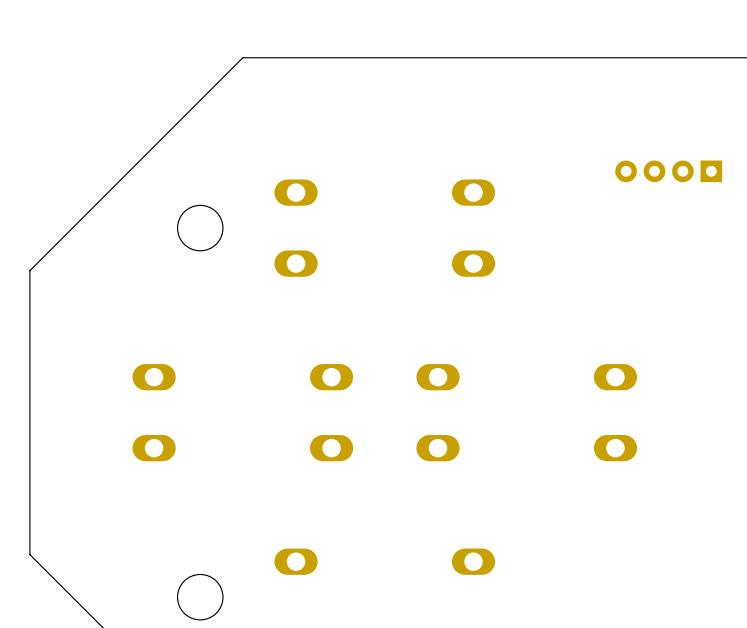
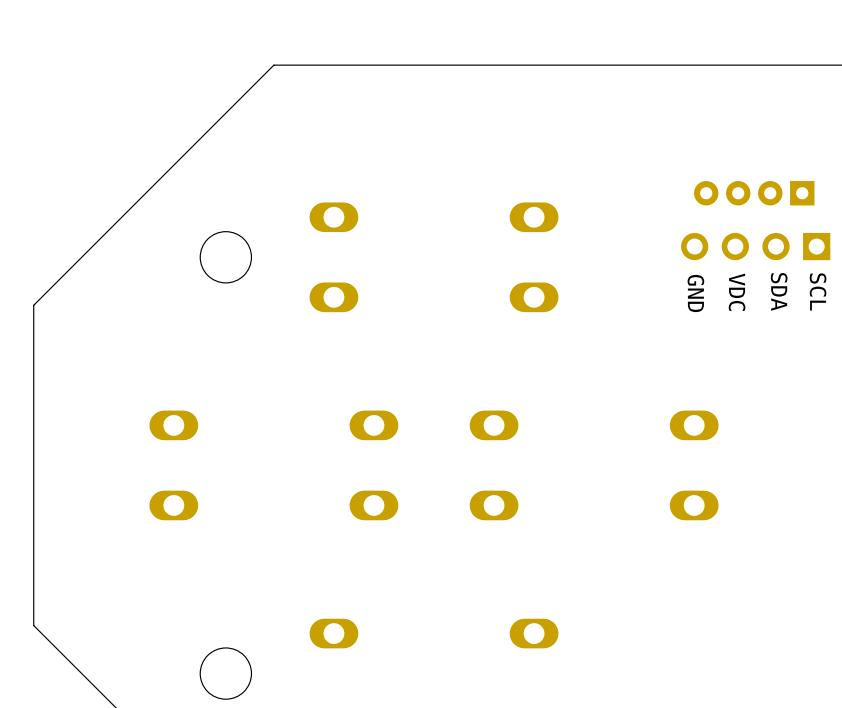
part: none -> (755, 246)
text: none -> SDA (779, 291)
text: none -> SCL (818, 291)
text: none -> VDC (737, 292)
text: none -> GND (695, 293)

